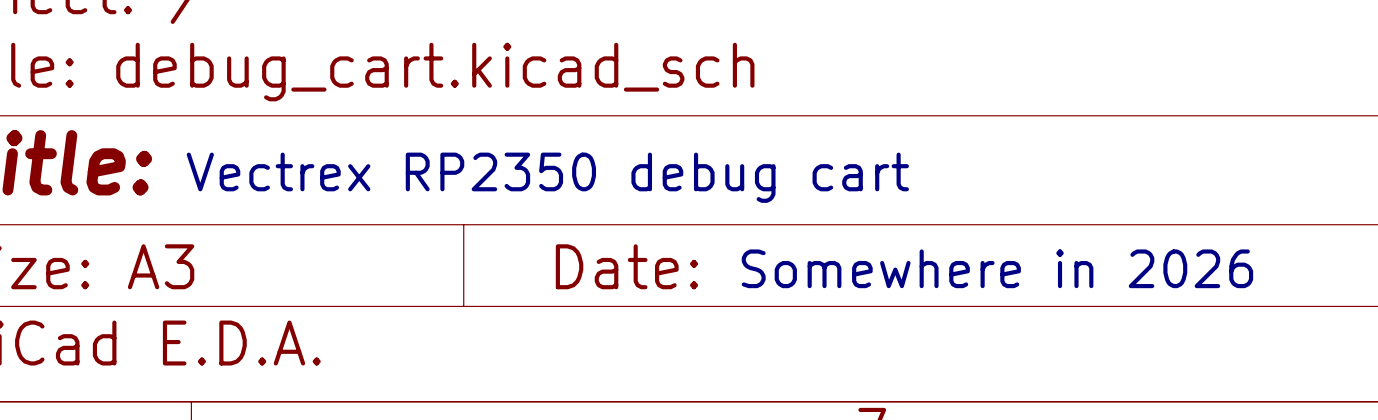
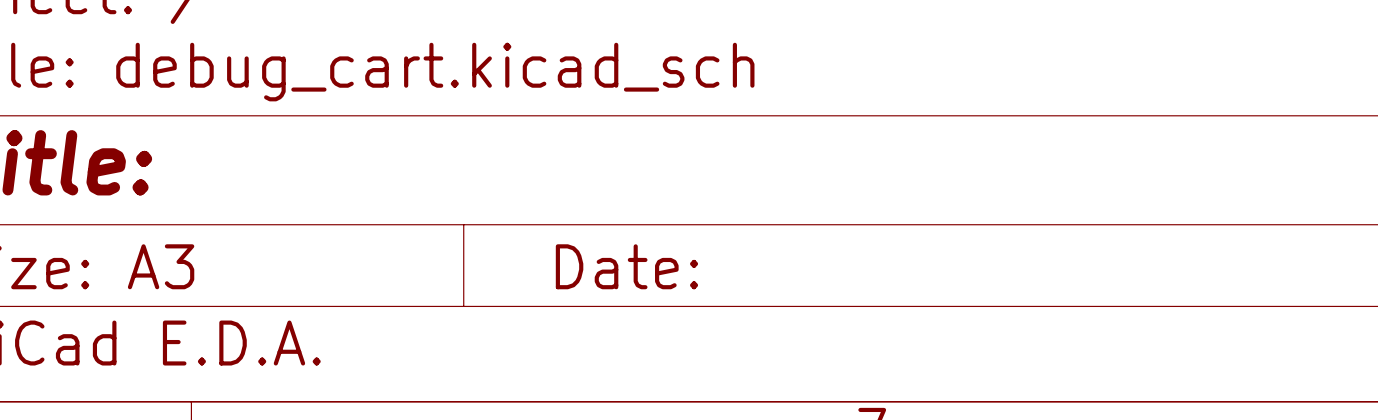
text: Vectrex RP2350 debug cart (547, 177) -> none
text: Somewhere in 2026 (997, 268) -> none

